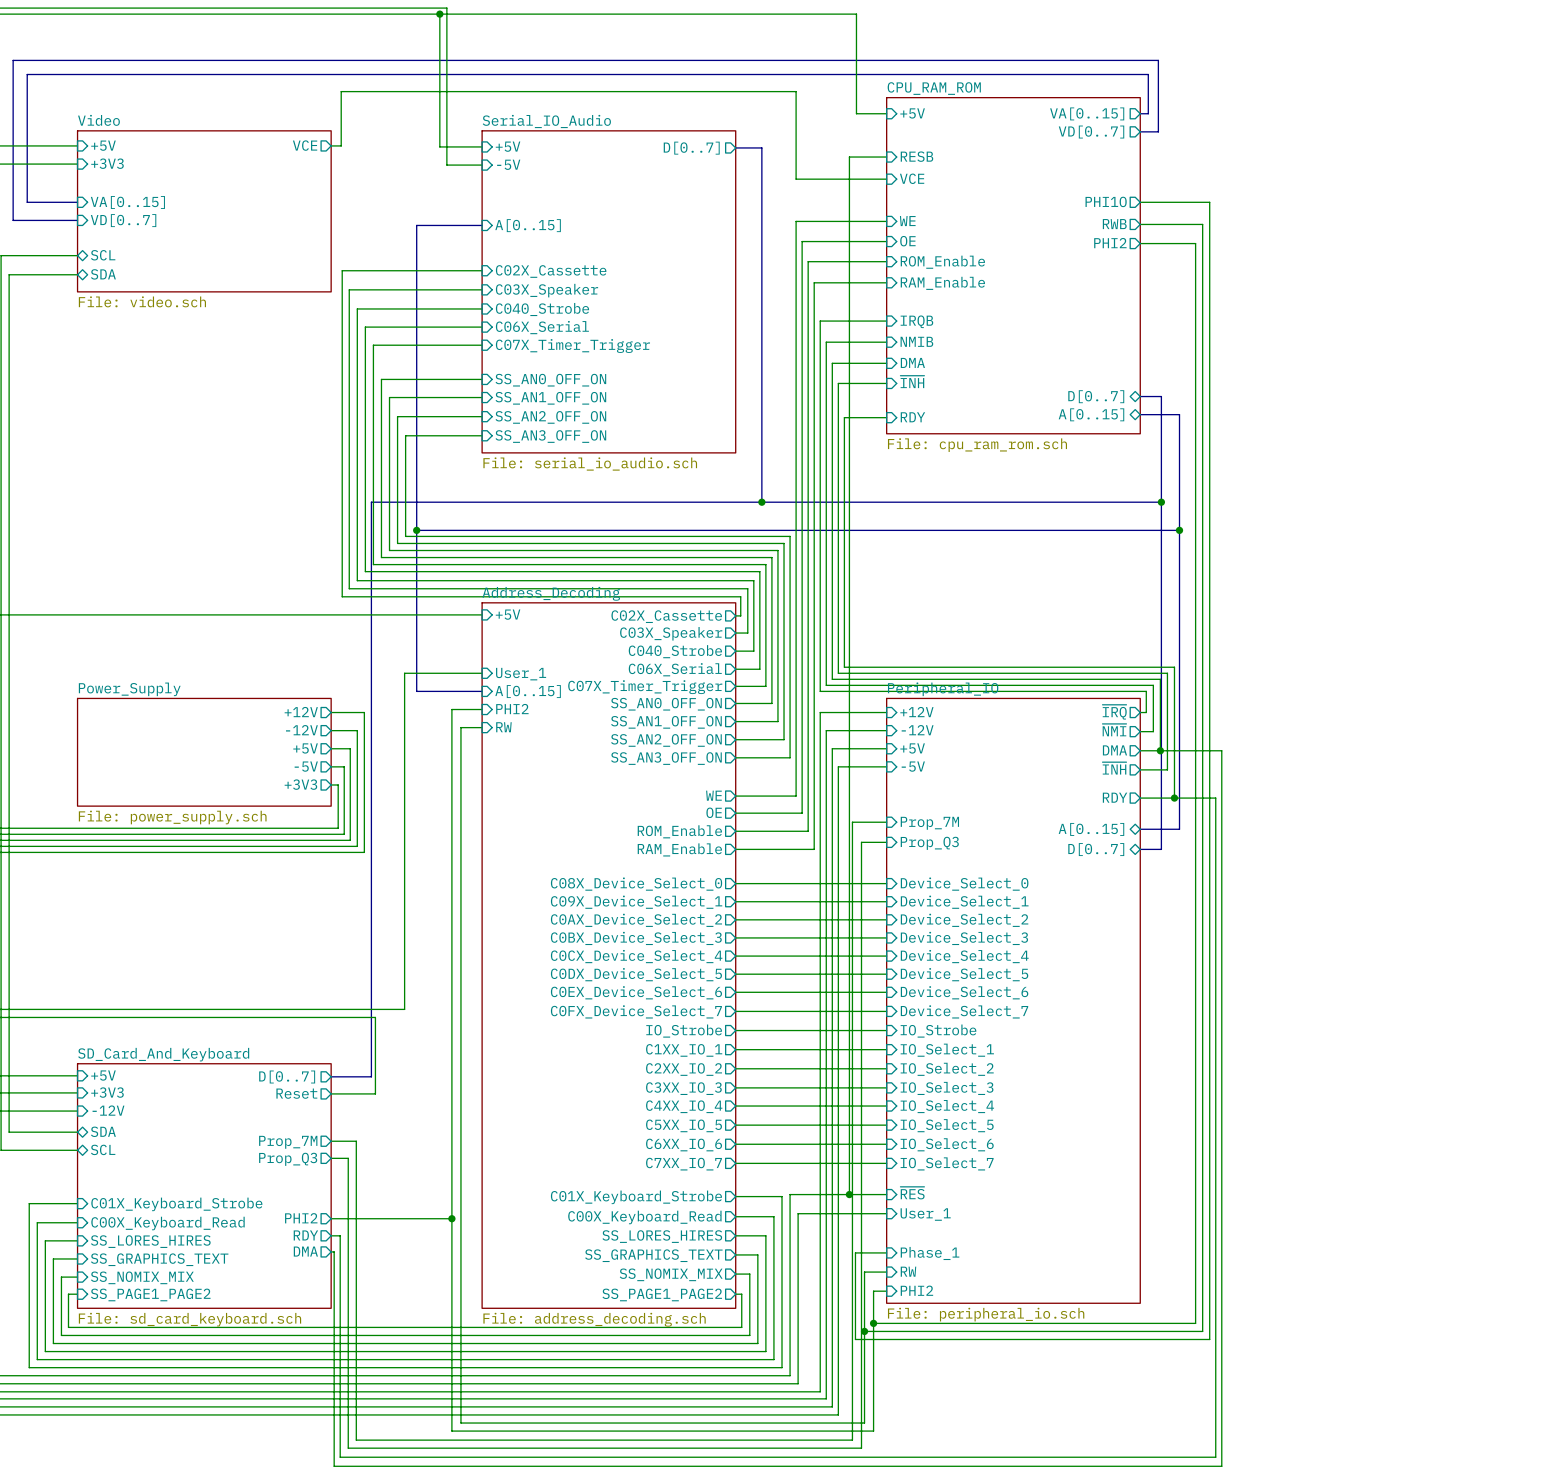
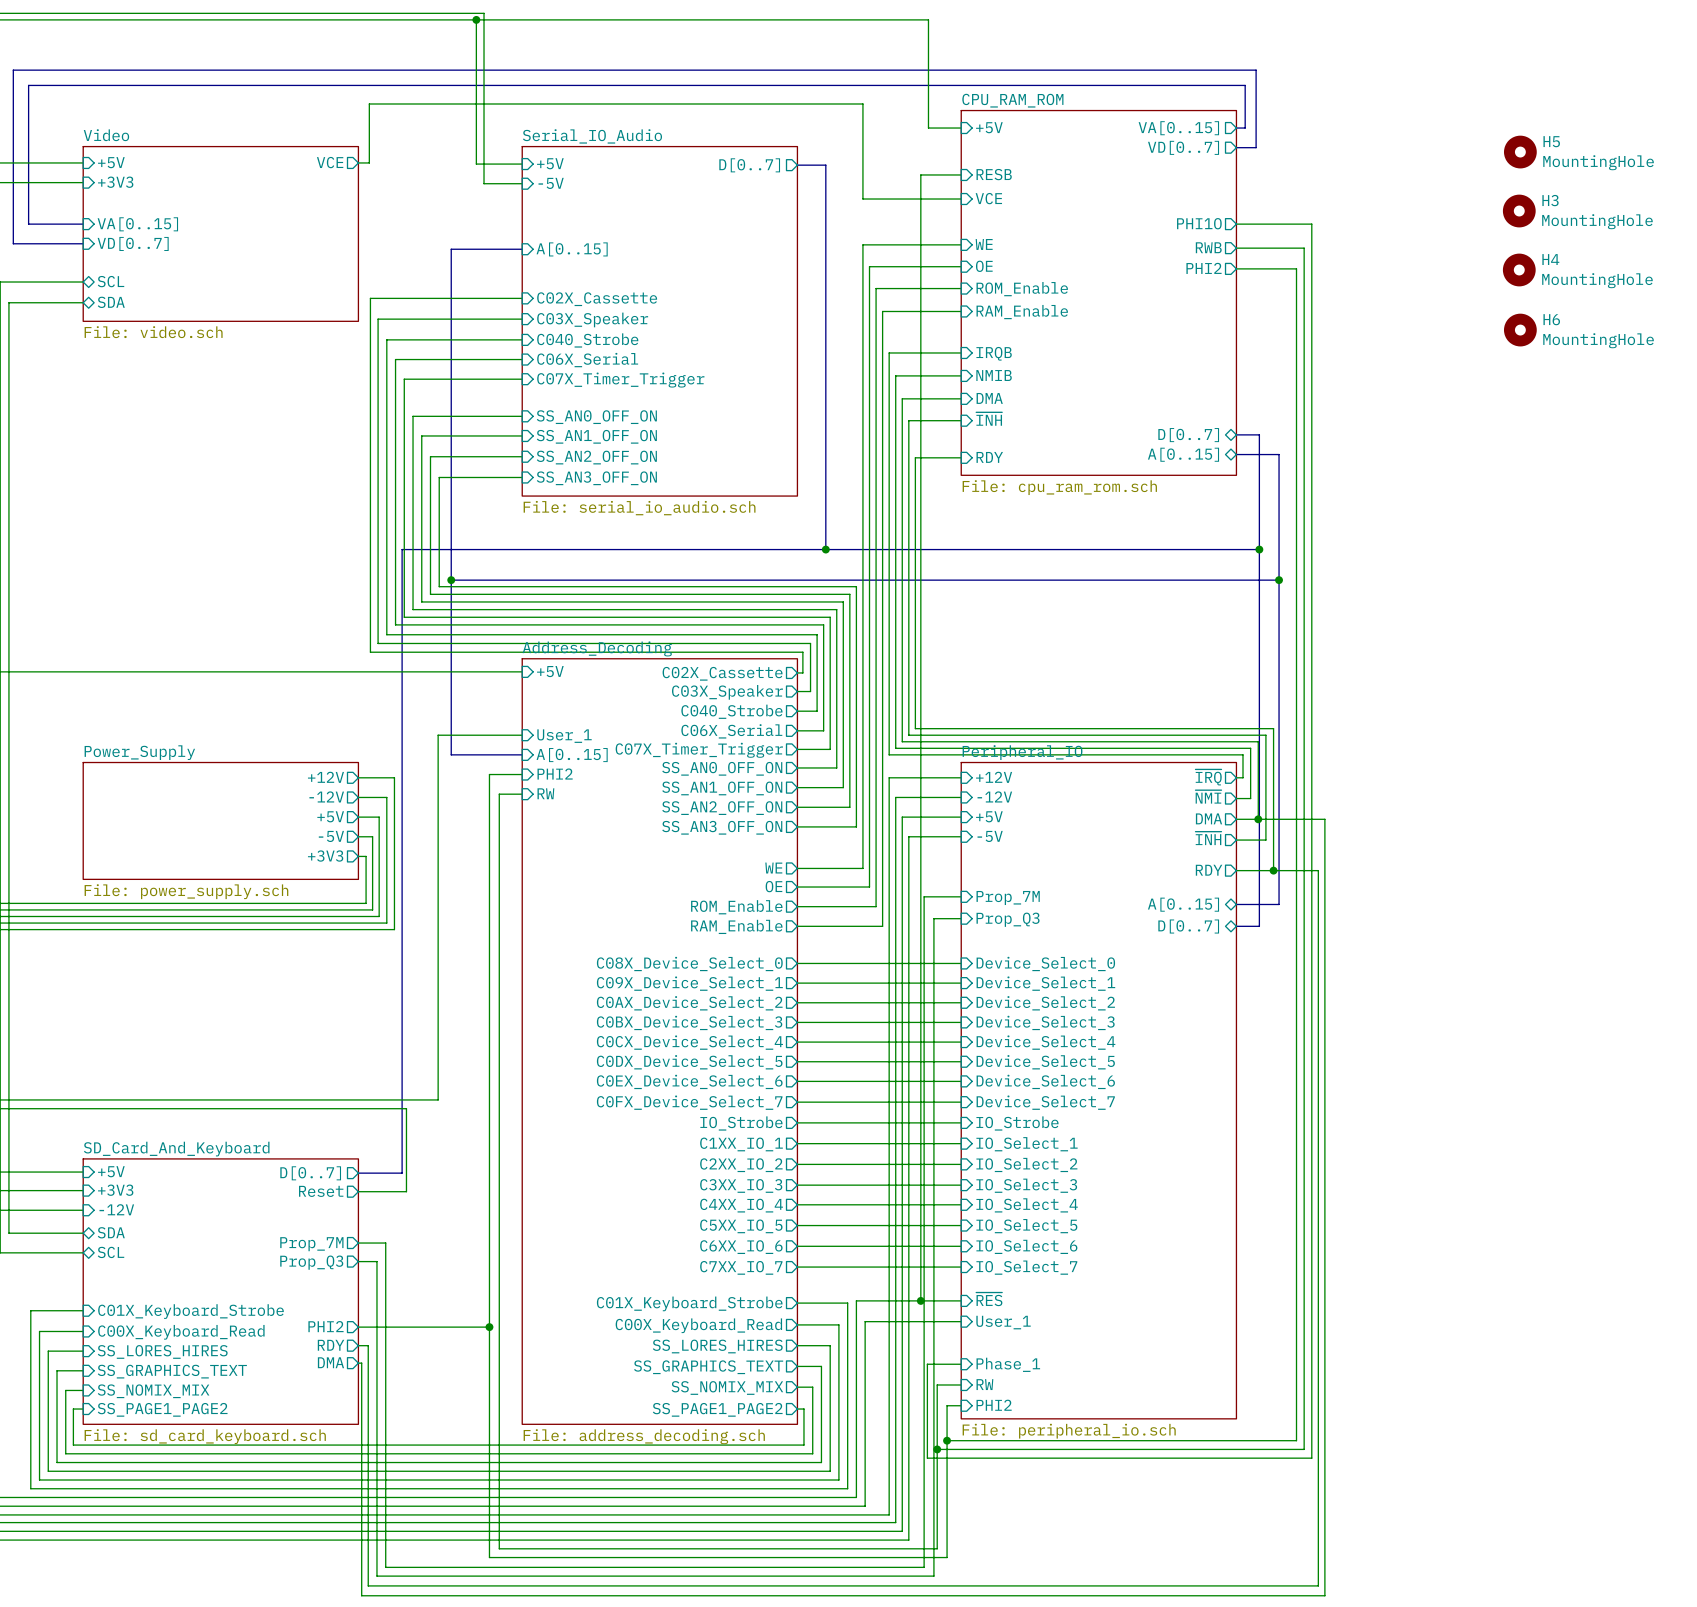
H5: none -> MountingHole (1520, 152)
H3: none -> MountingHole (1519, 211)
H4: none -> MountingHole (1519, 269)
H6: none -> MountingHole (1520, 330)

